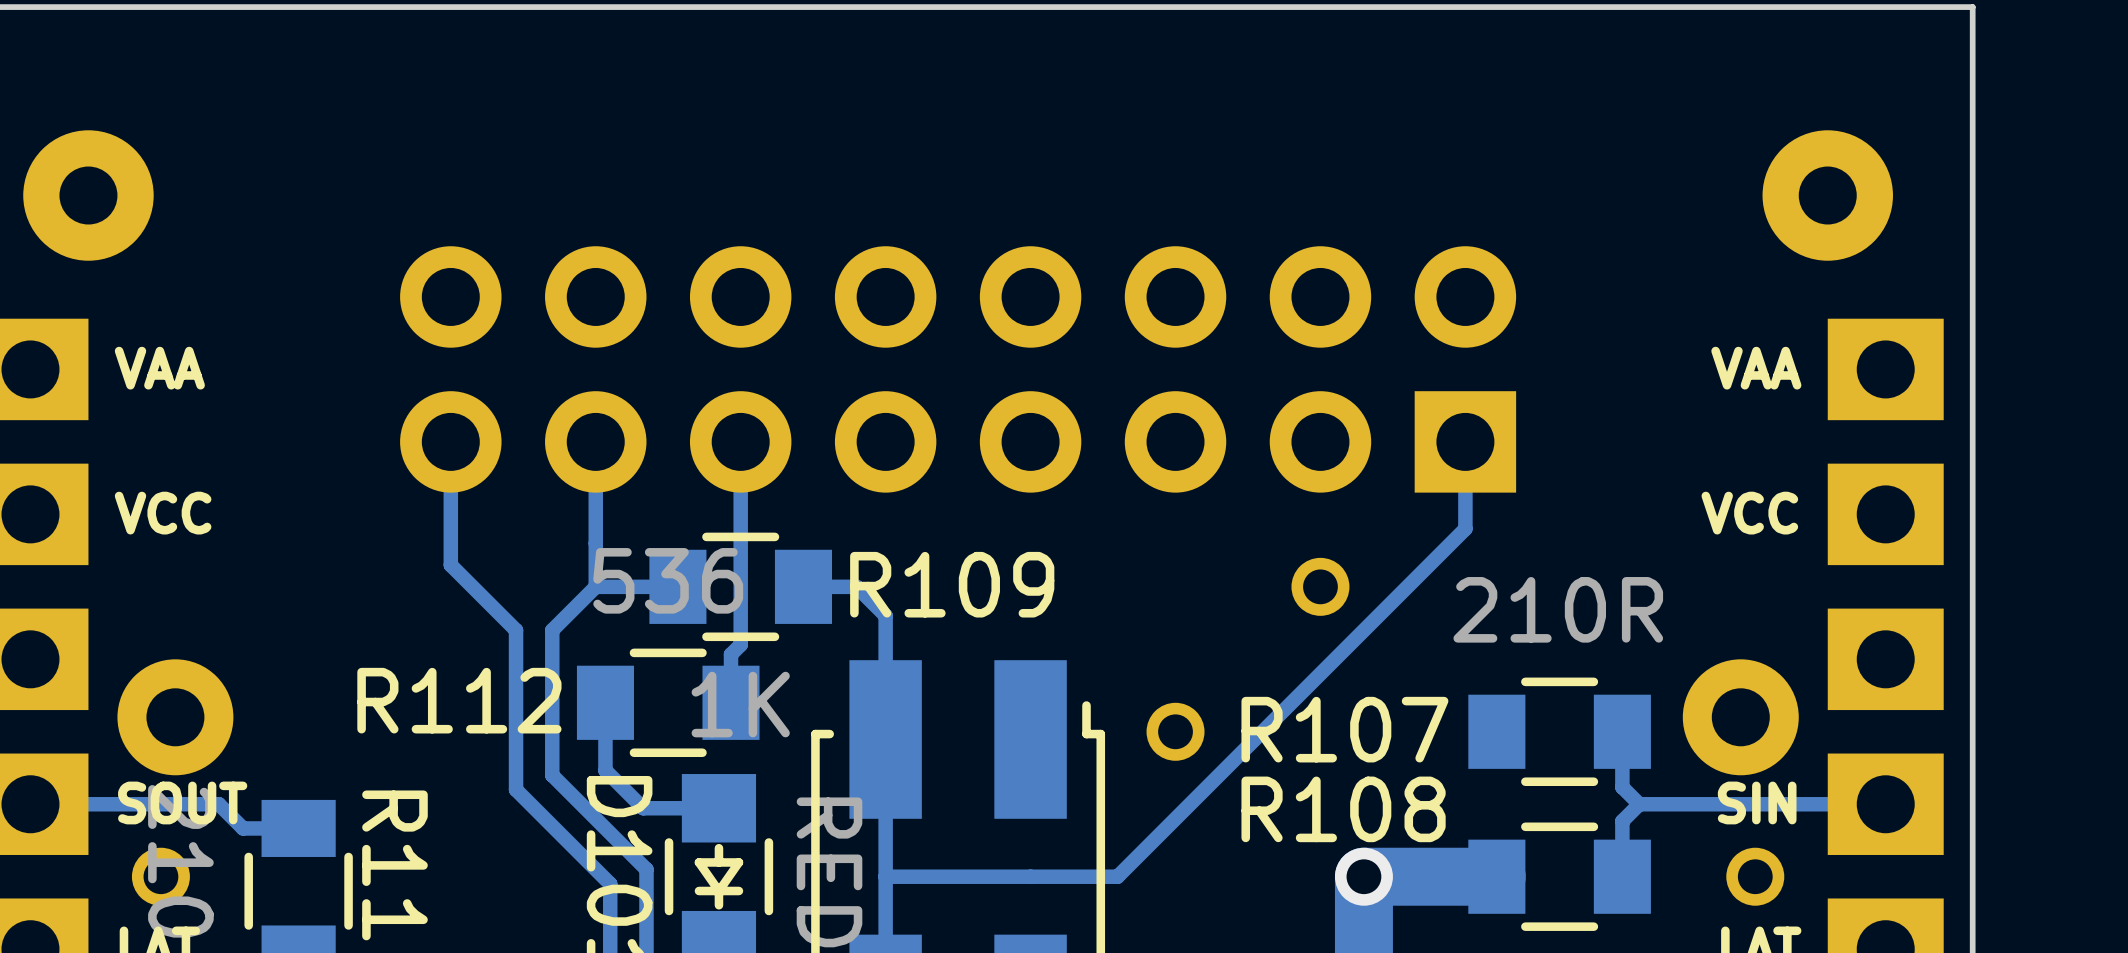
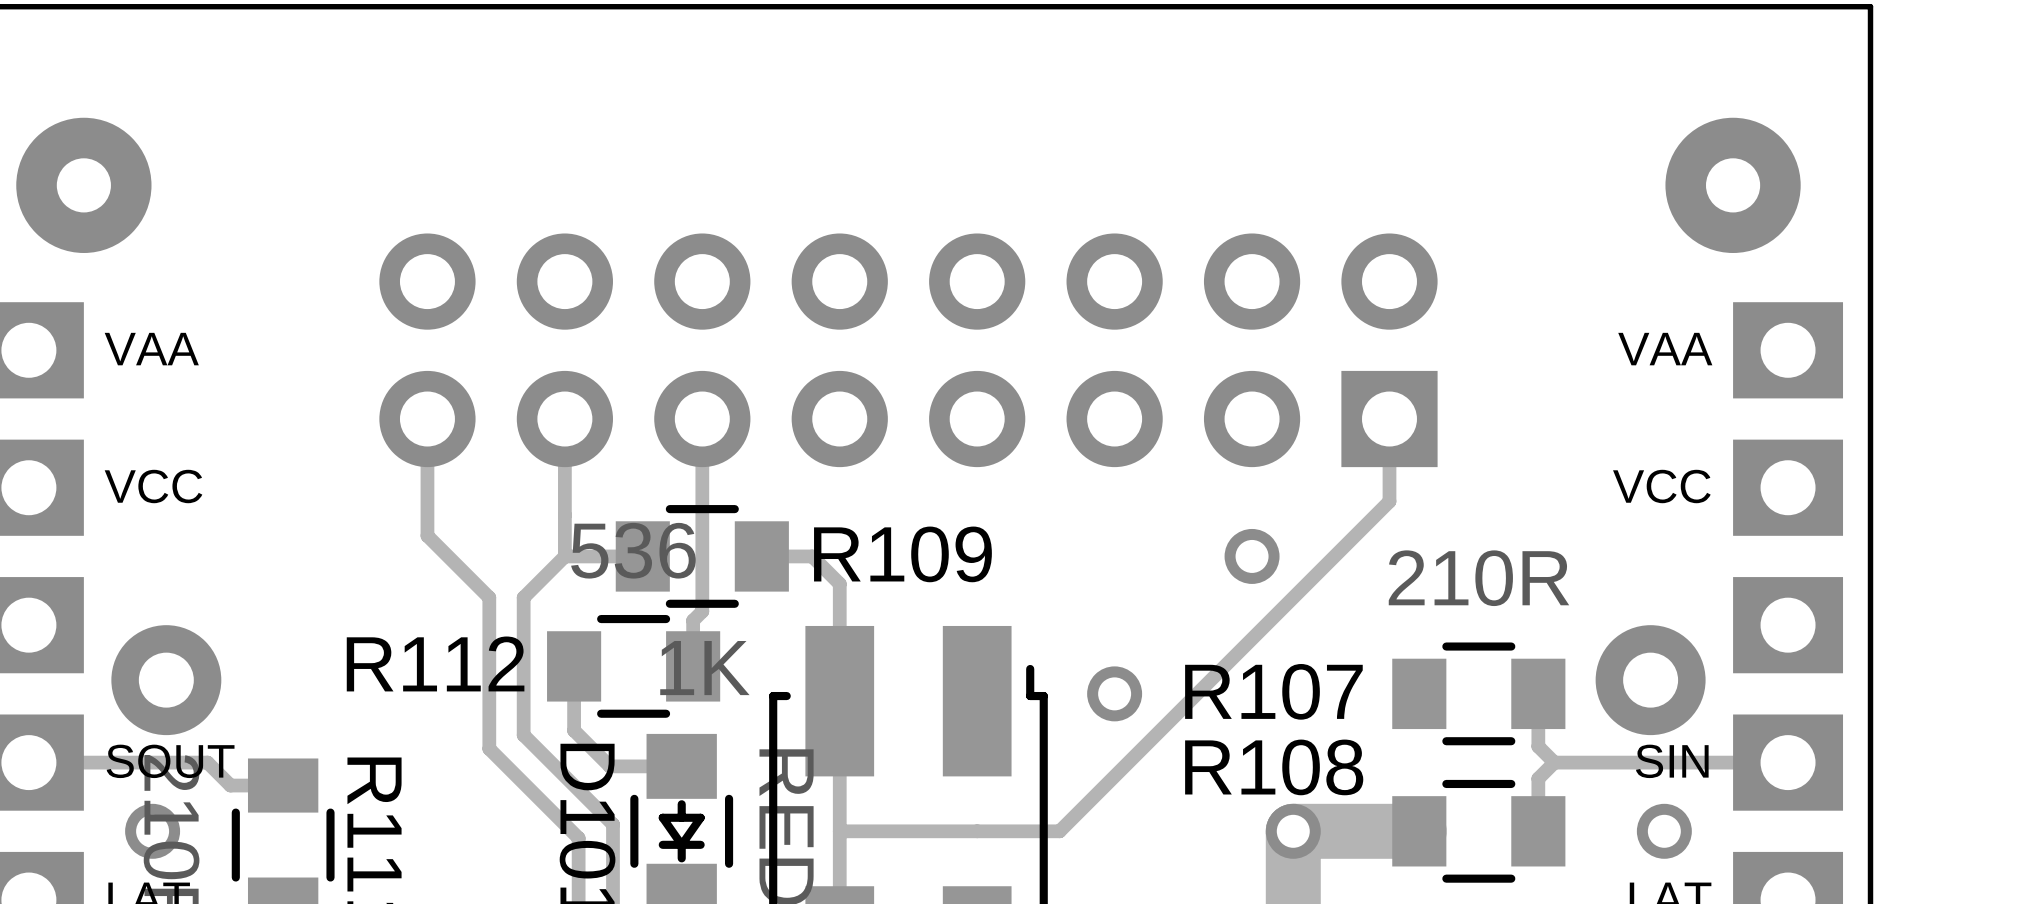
part footprint: [23, 130, 154, 261] -> [16, 117, 152, 253]
part footprint: [1762, 130, 1893, 261] -> [1665, 117, 1801, 253]

